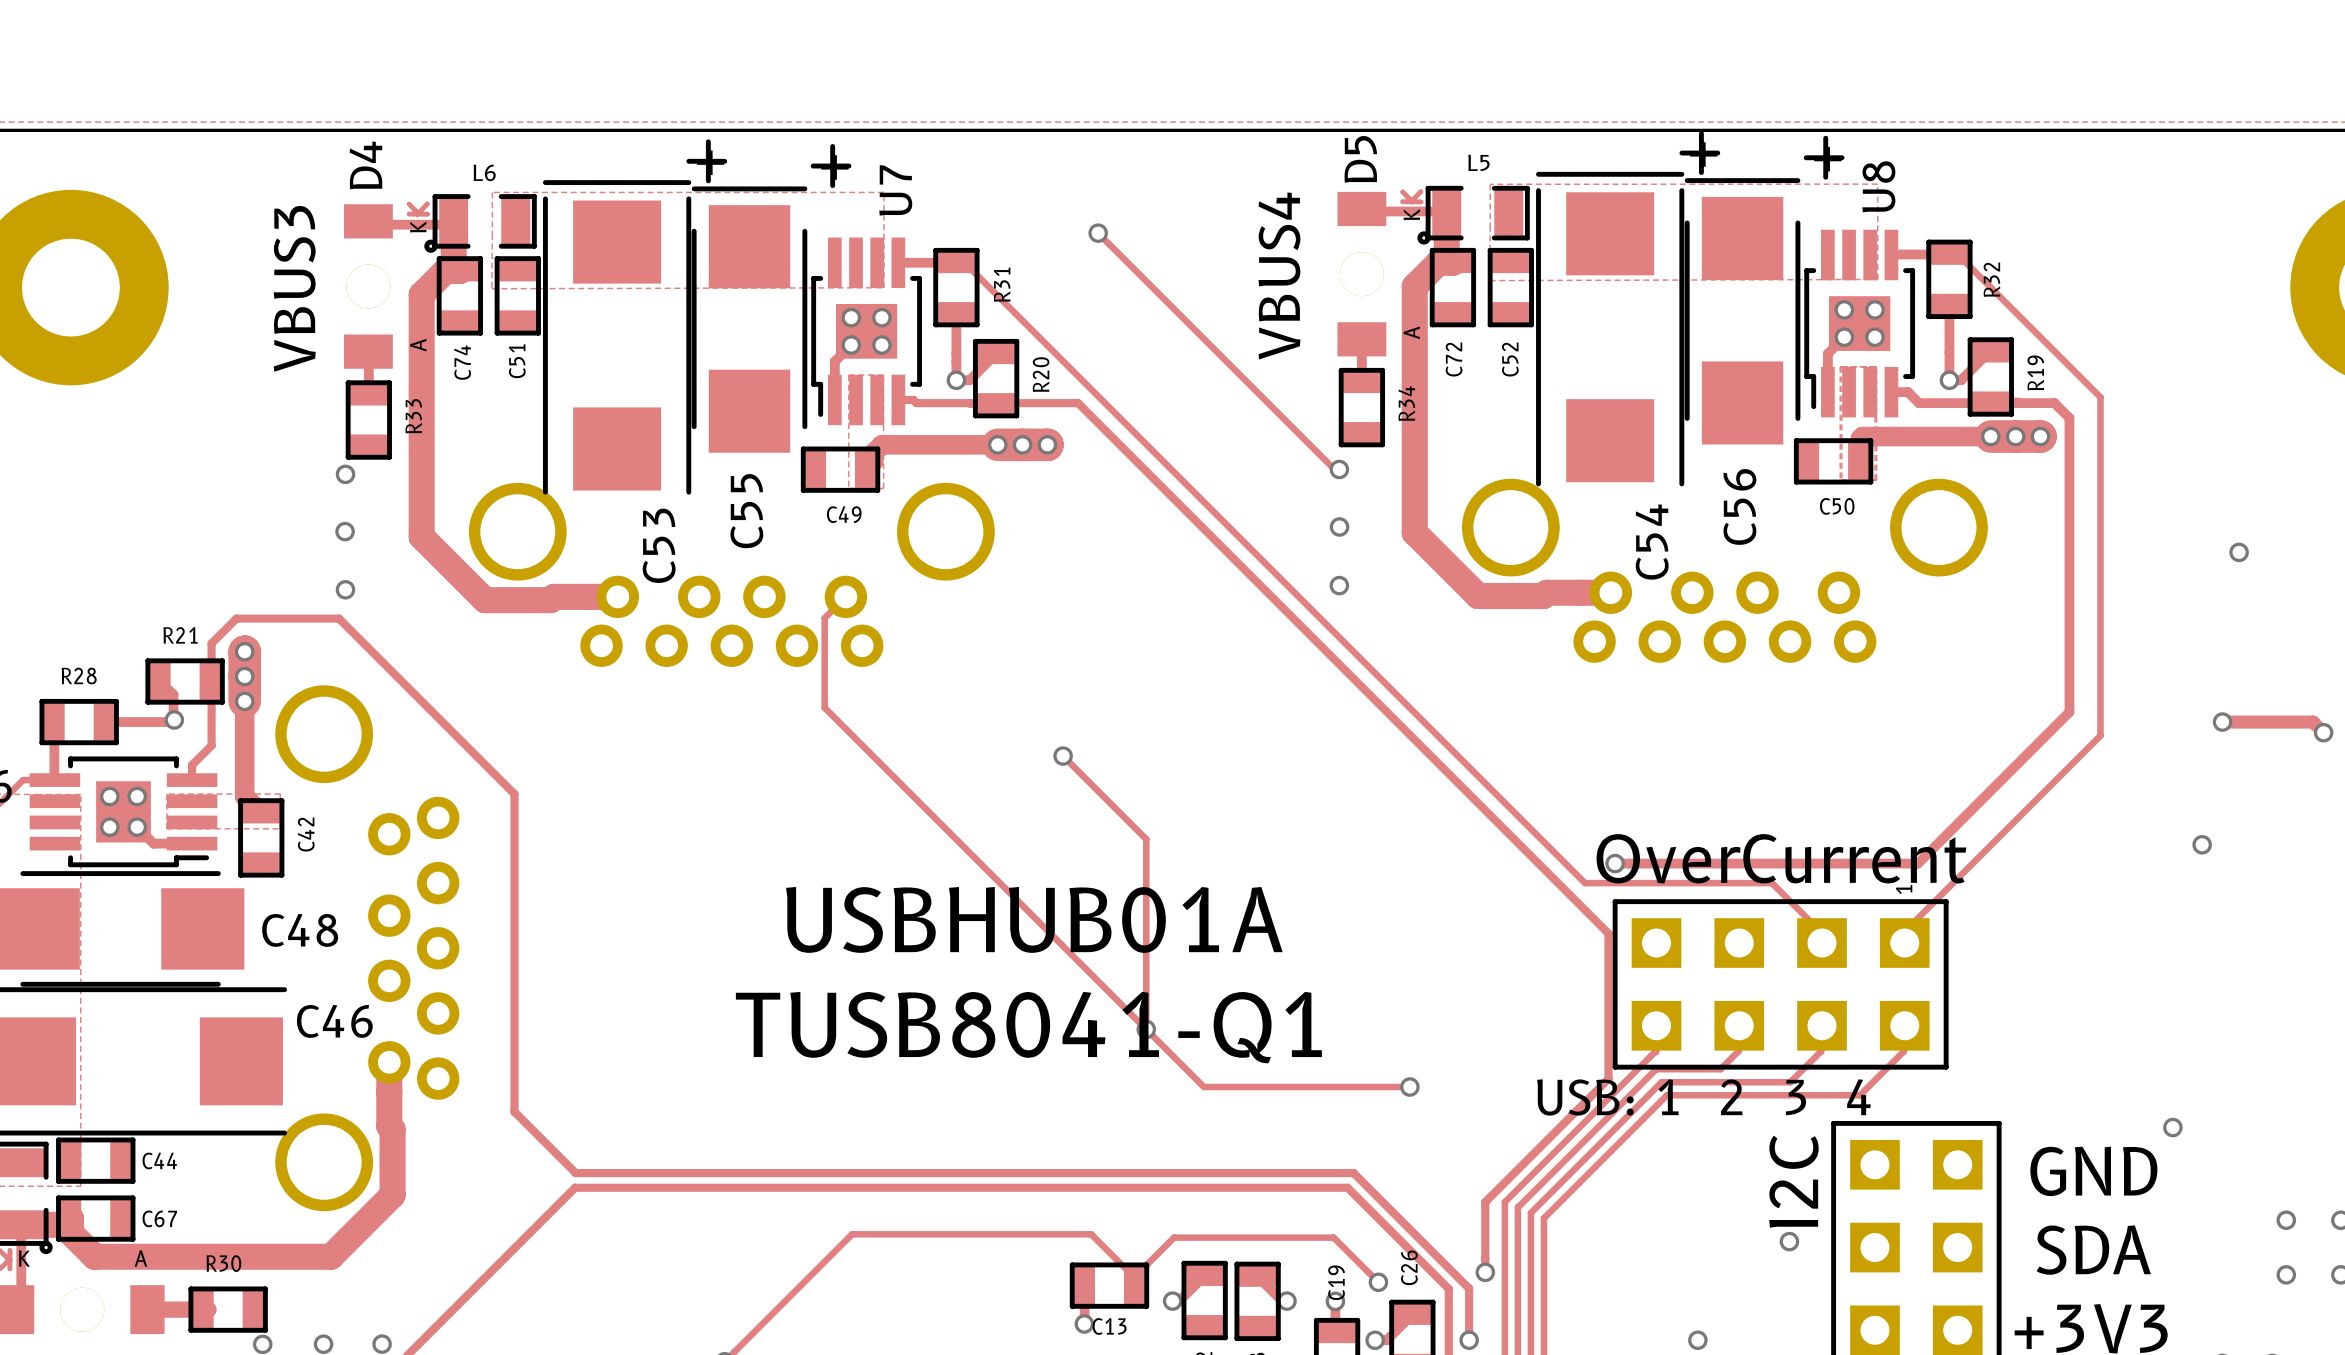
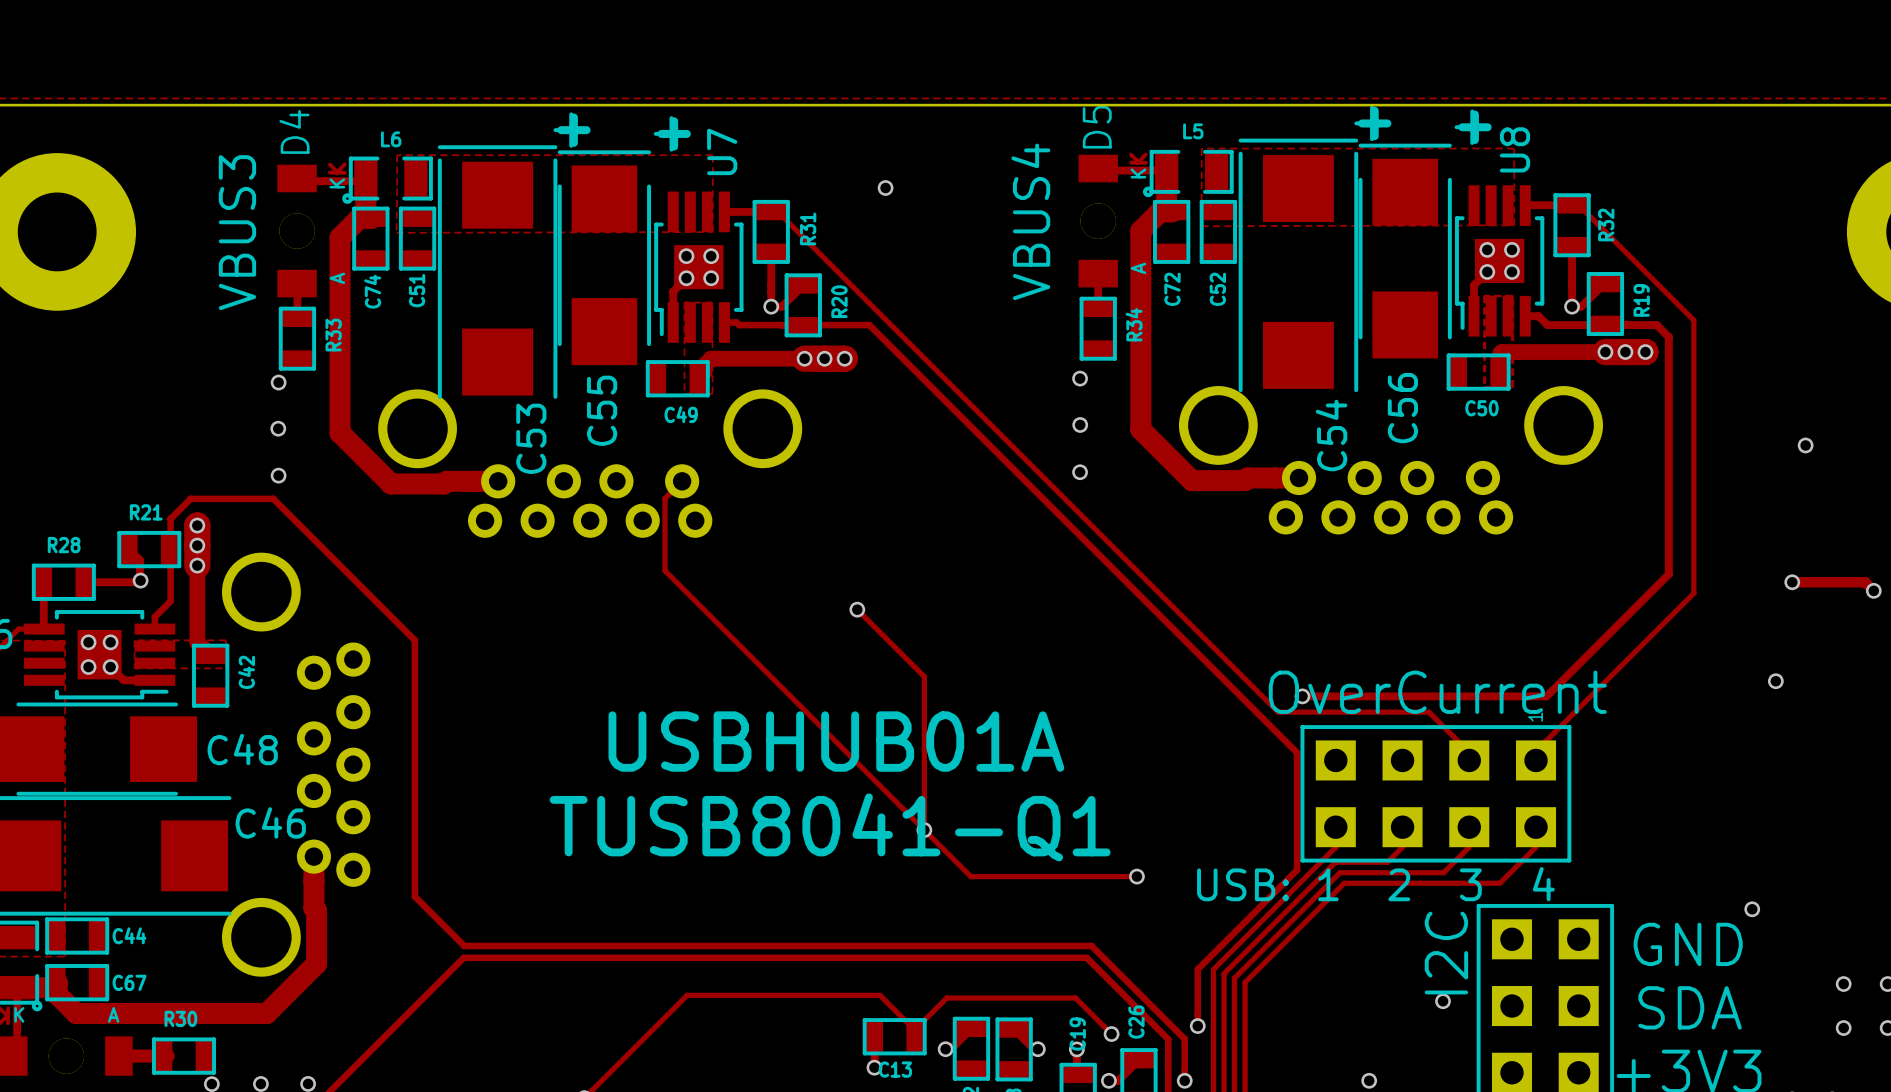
track: (1098, 233) (1334, 469) (1339, 469) -> none

